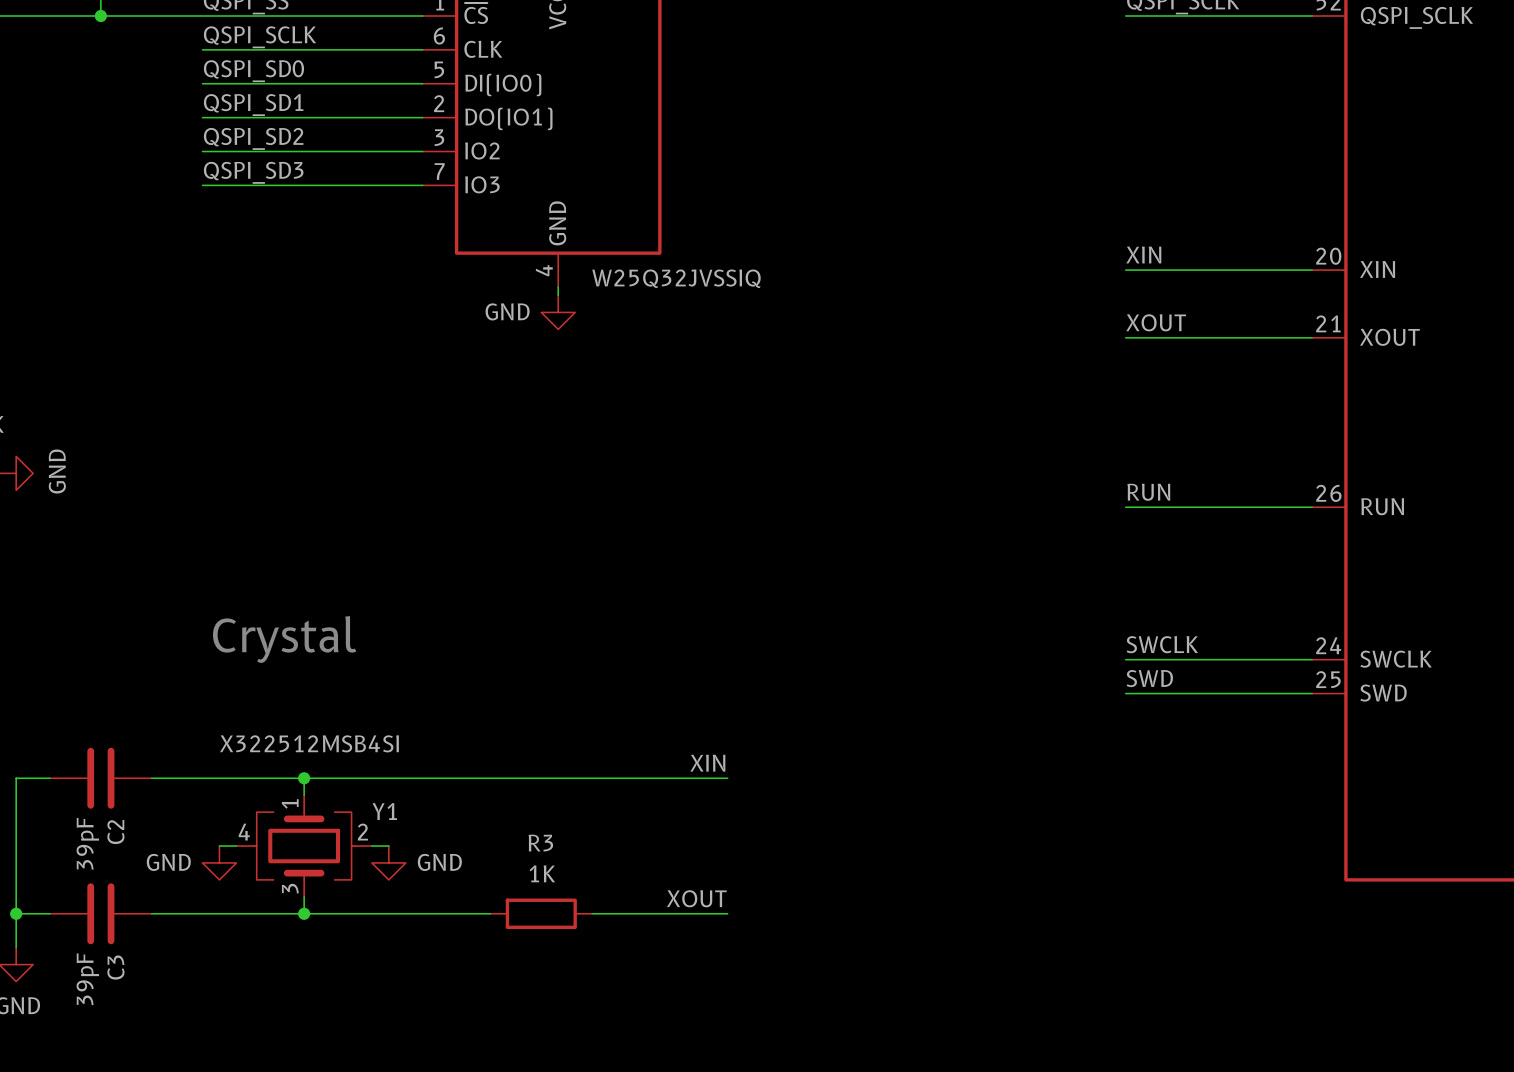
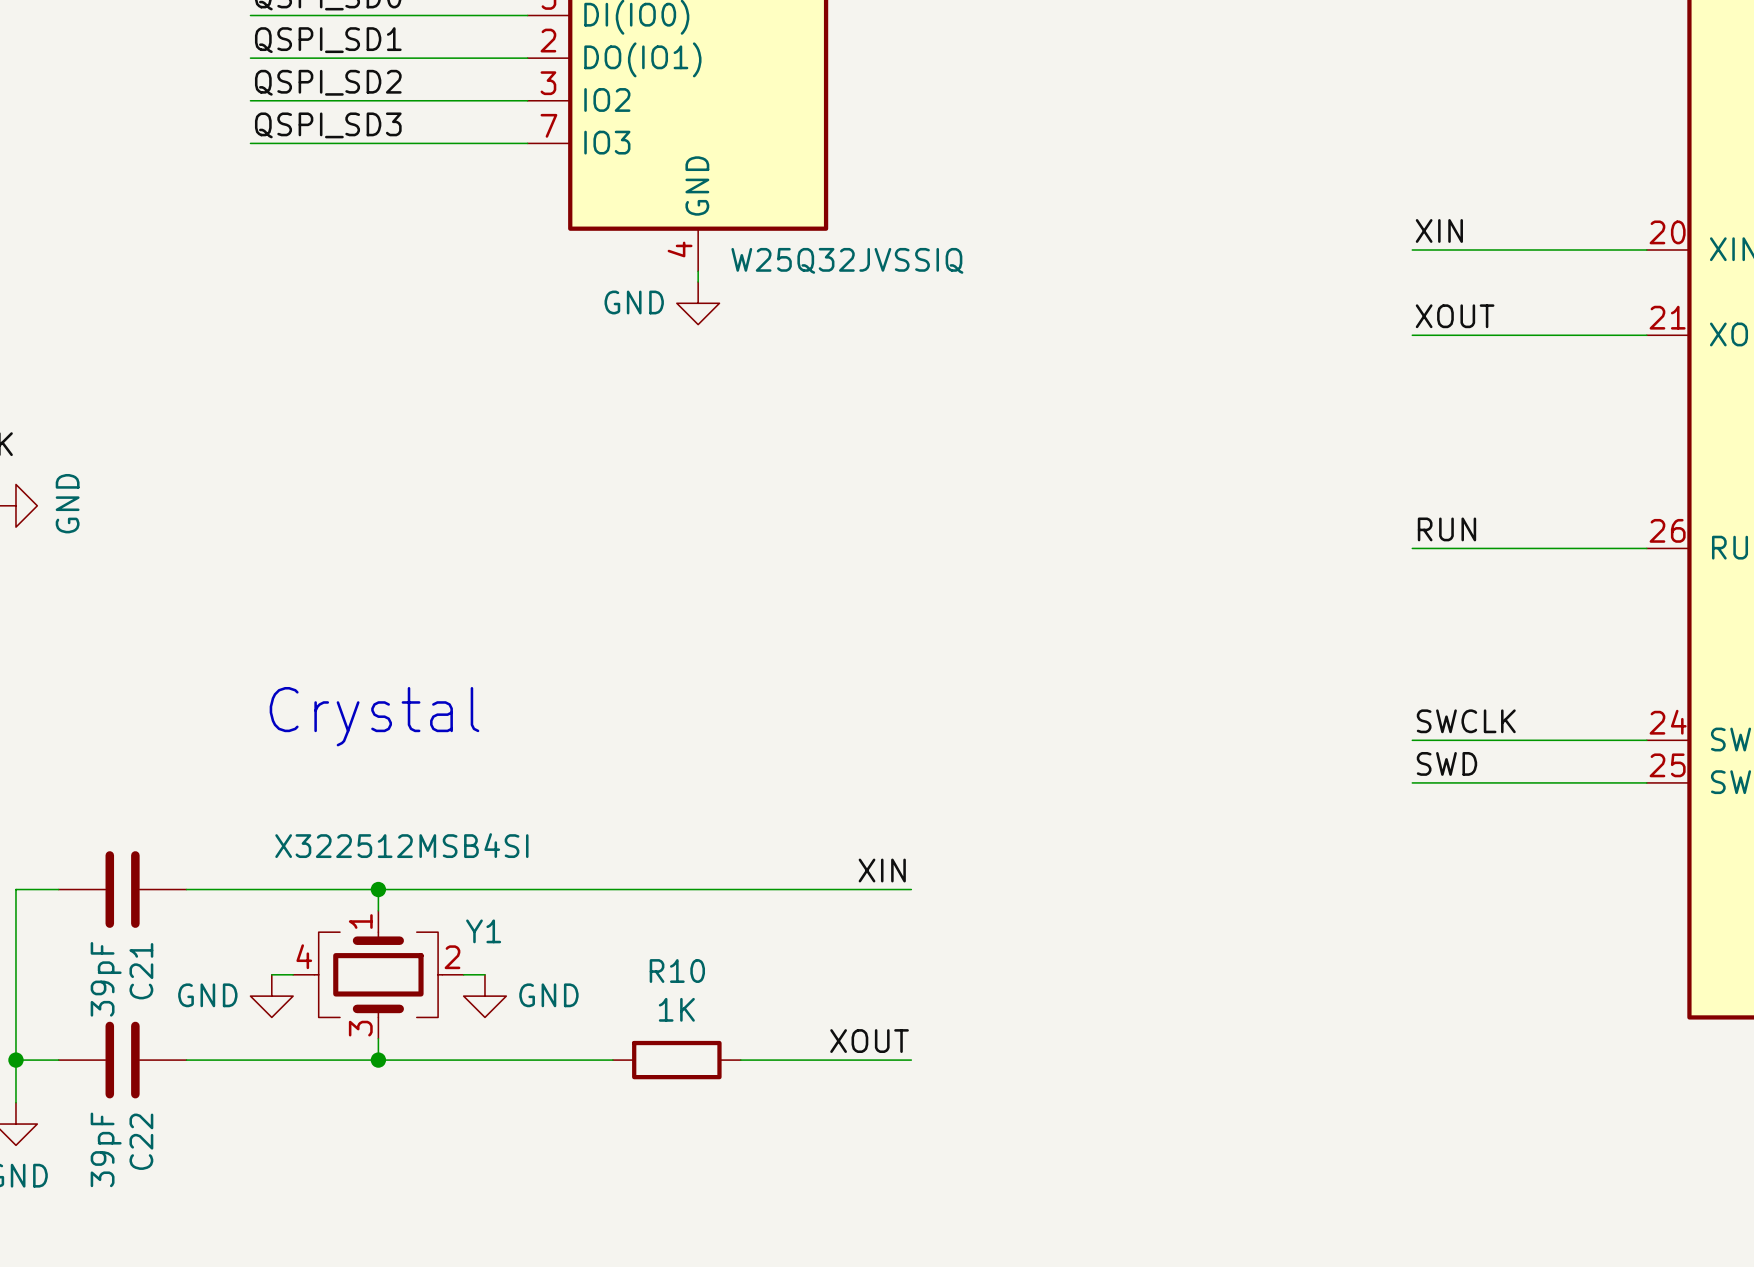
C2 name: C2 (115, 832) -> C21 (141, 971)
R3 name: R3 (540, 843) -> R10 (677, 971)
C3 name: C3 (115, 967) -> C22 (141, 1141)

